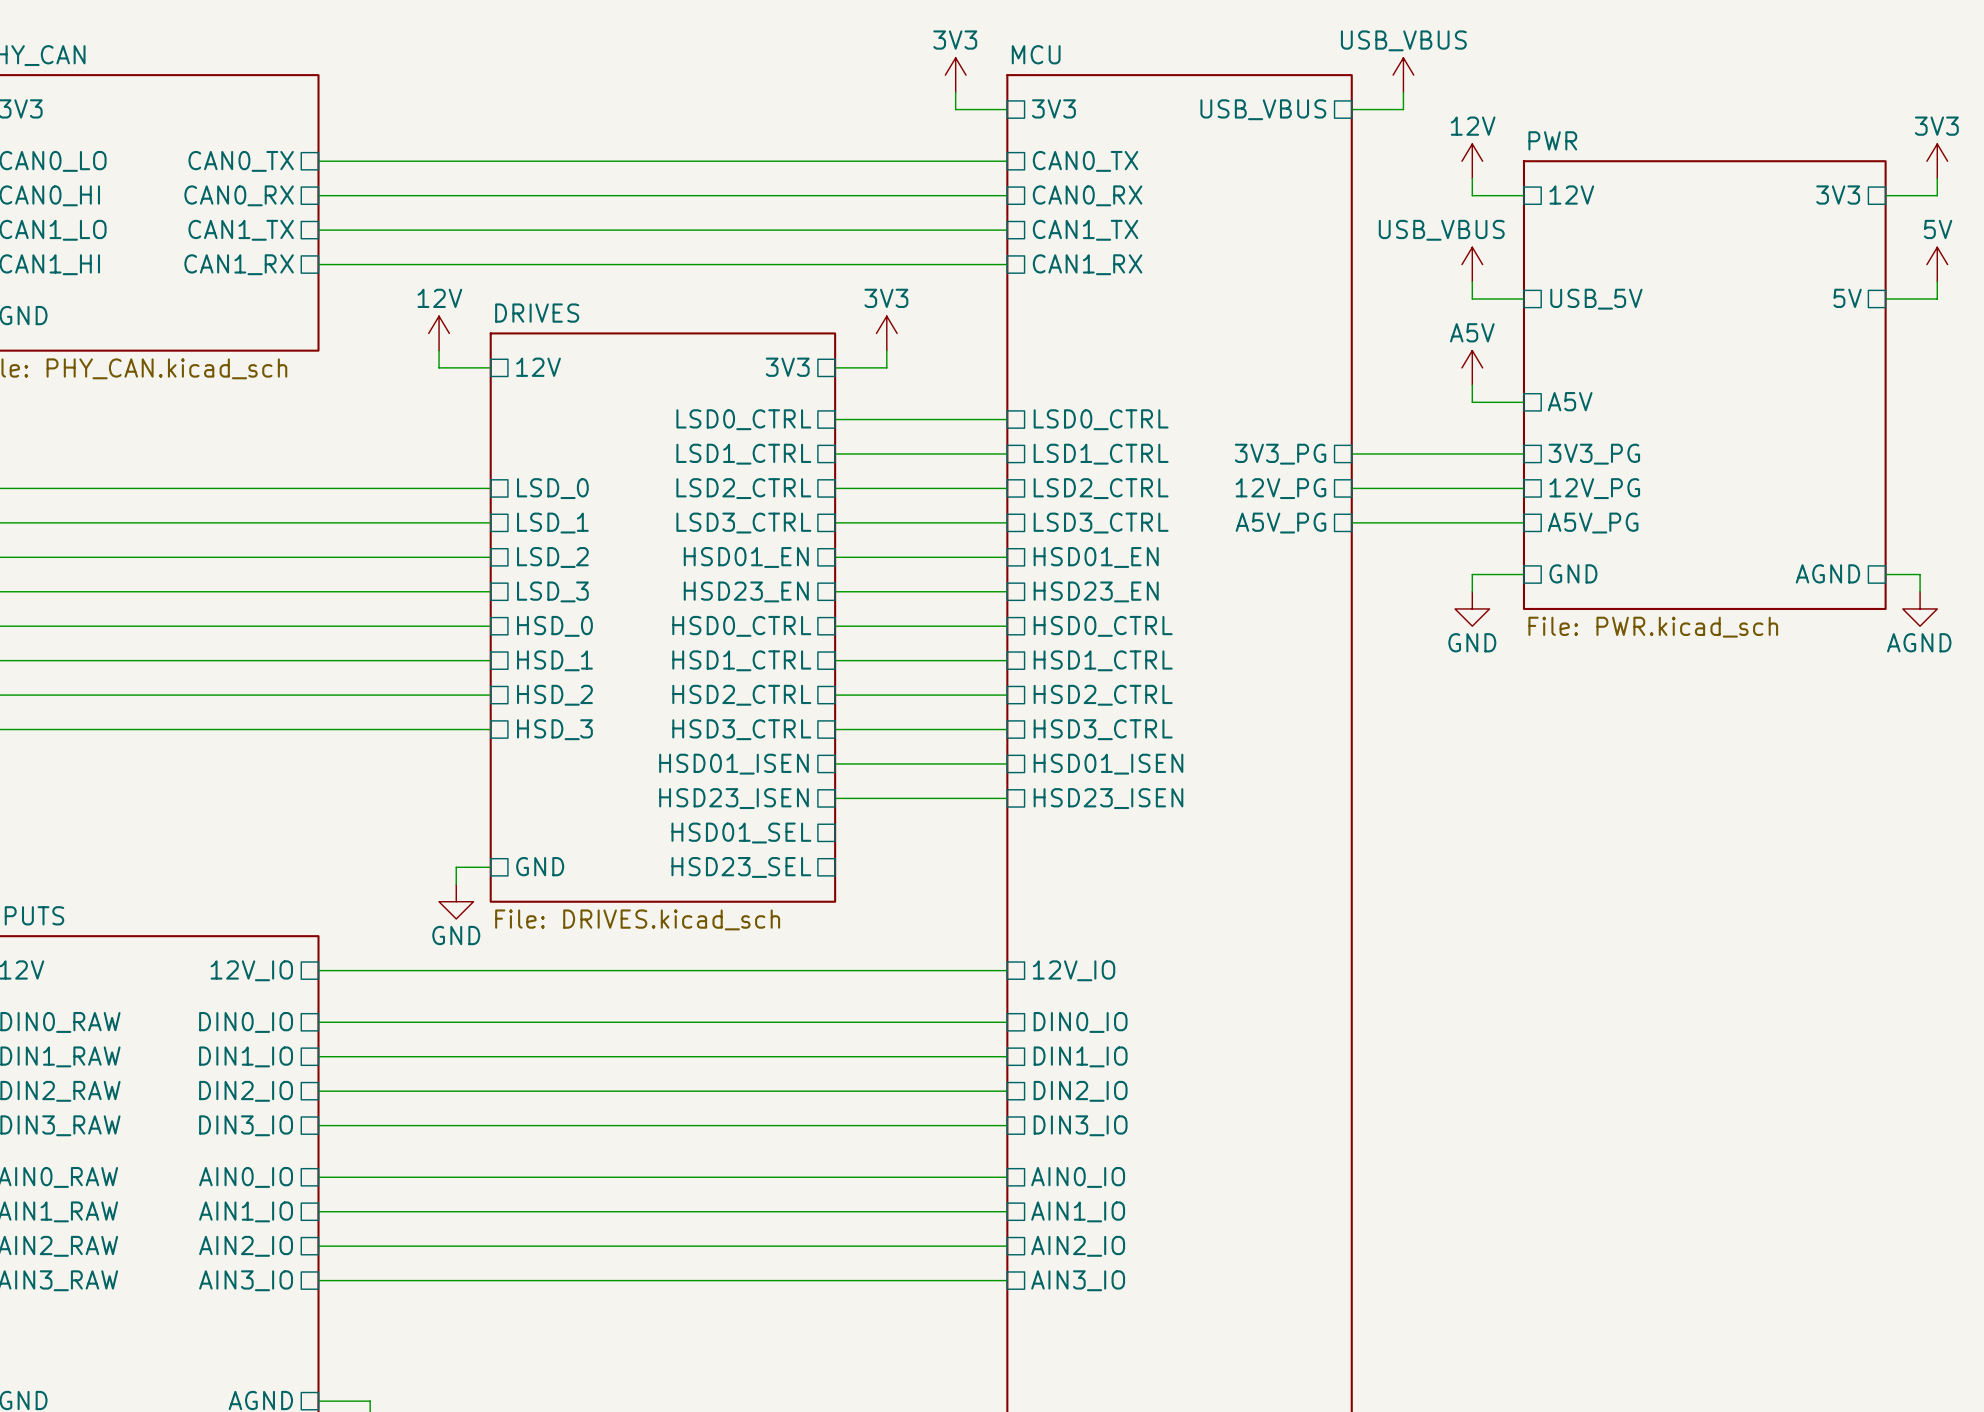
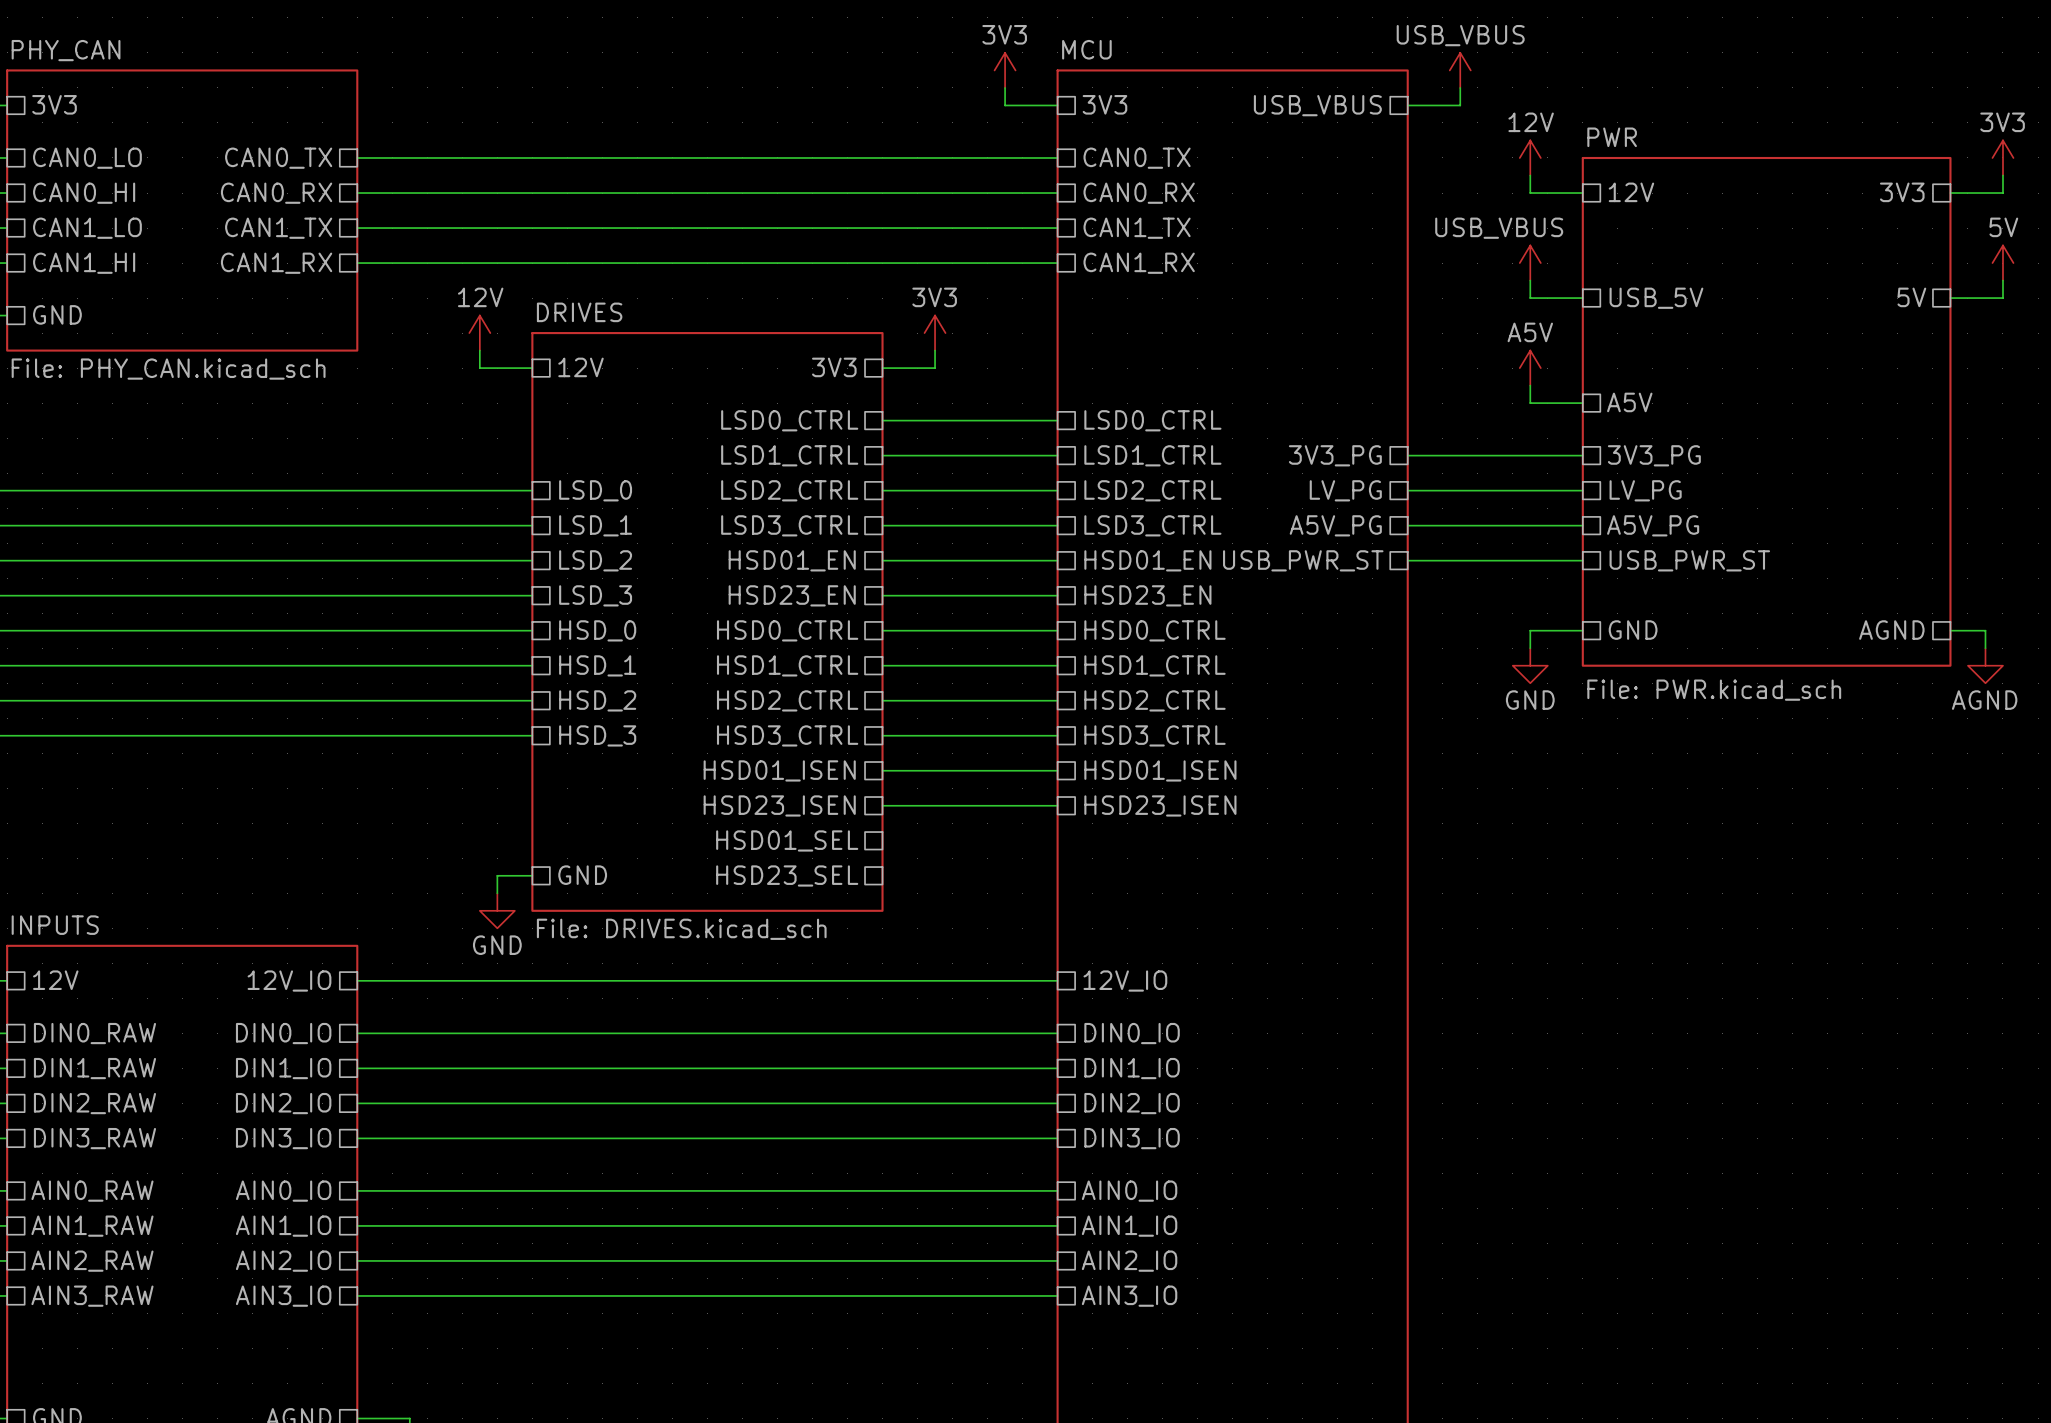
sheet PWR: File: PWR.kicad_sch (1704, 385) -> none
sheet PWR: none -> File: PWR.kicad_sch (1766, 411)
sheet pin: 12V_PG (1280, 488) -> LV_PG (1345, 490)
sheet pin: 12V_PG (1594, 488) -> LV_PG (1645, 490)
sheet pin: none -> USB_PWR_ST (1303, 560)
wire: none -> (1407, 560) (1582, 560)
sheet pin: none -> USB_PWR_ST (1689, 560)
sheet pin position: GND (1573, 573) -> GND (1633, 630)
sheet pin position: AGND (1827, 573) -> AGND (1891, 630)
wire: (1523, 574) (1472, 574) (1472, 591) -> (1582, 630) (1530, 630) (1530, 648)
wire: (1885, 574) (1920, 574) (1920, 591) -> (1950, 630) (1985, 630) (1985, 648)
power symbol position: GND (1472, 608) -> GND (1530, 665)
power symbol position: AGND (1920, 608) -> AGND (1985, 665)

